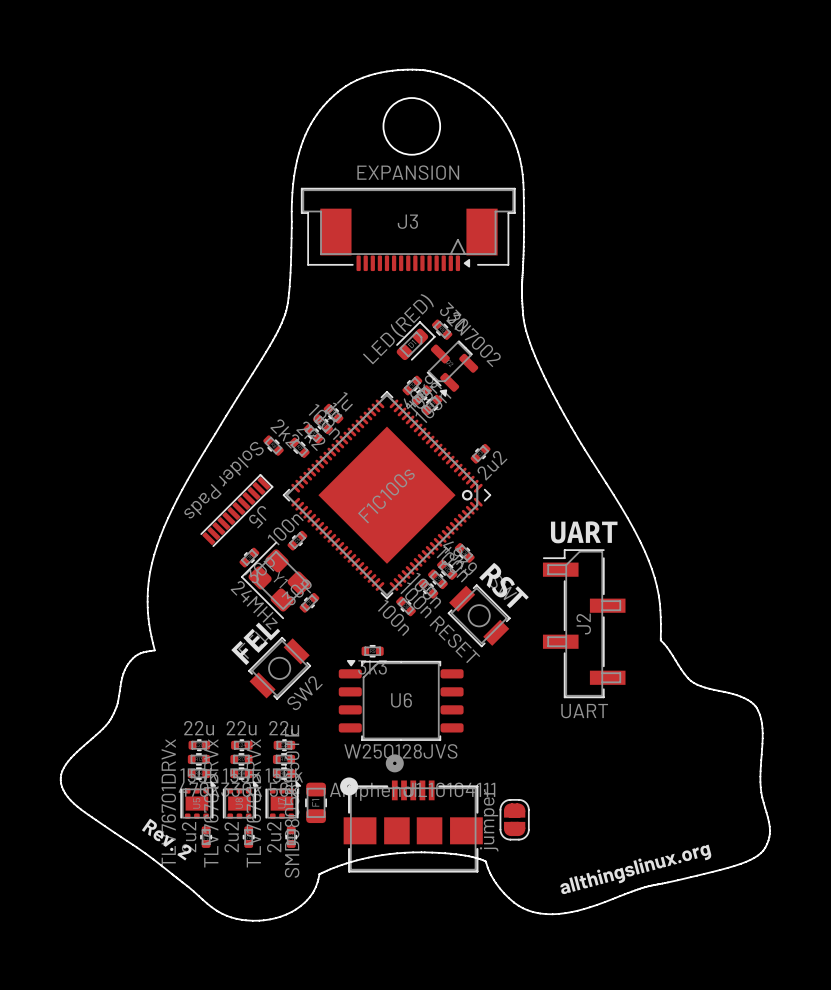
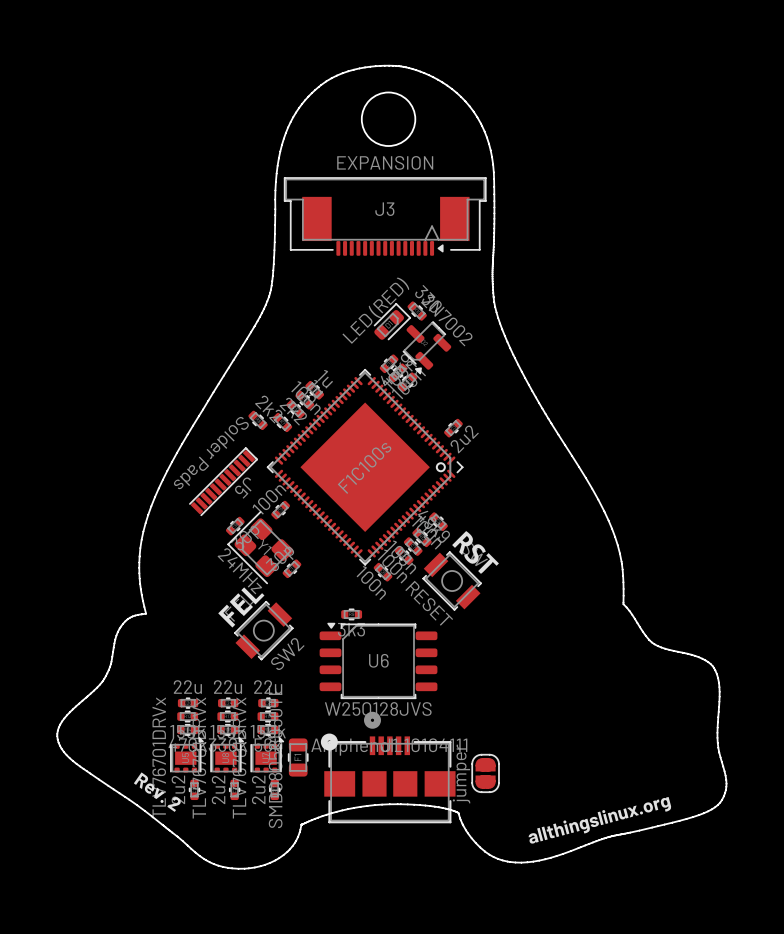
drawing: [550, 521, 618, 544] -> none
J2: UART (584, 623) -> none

